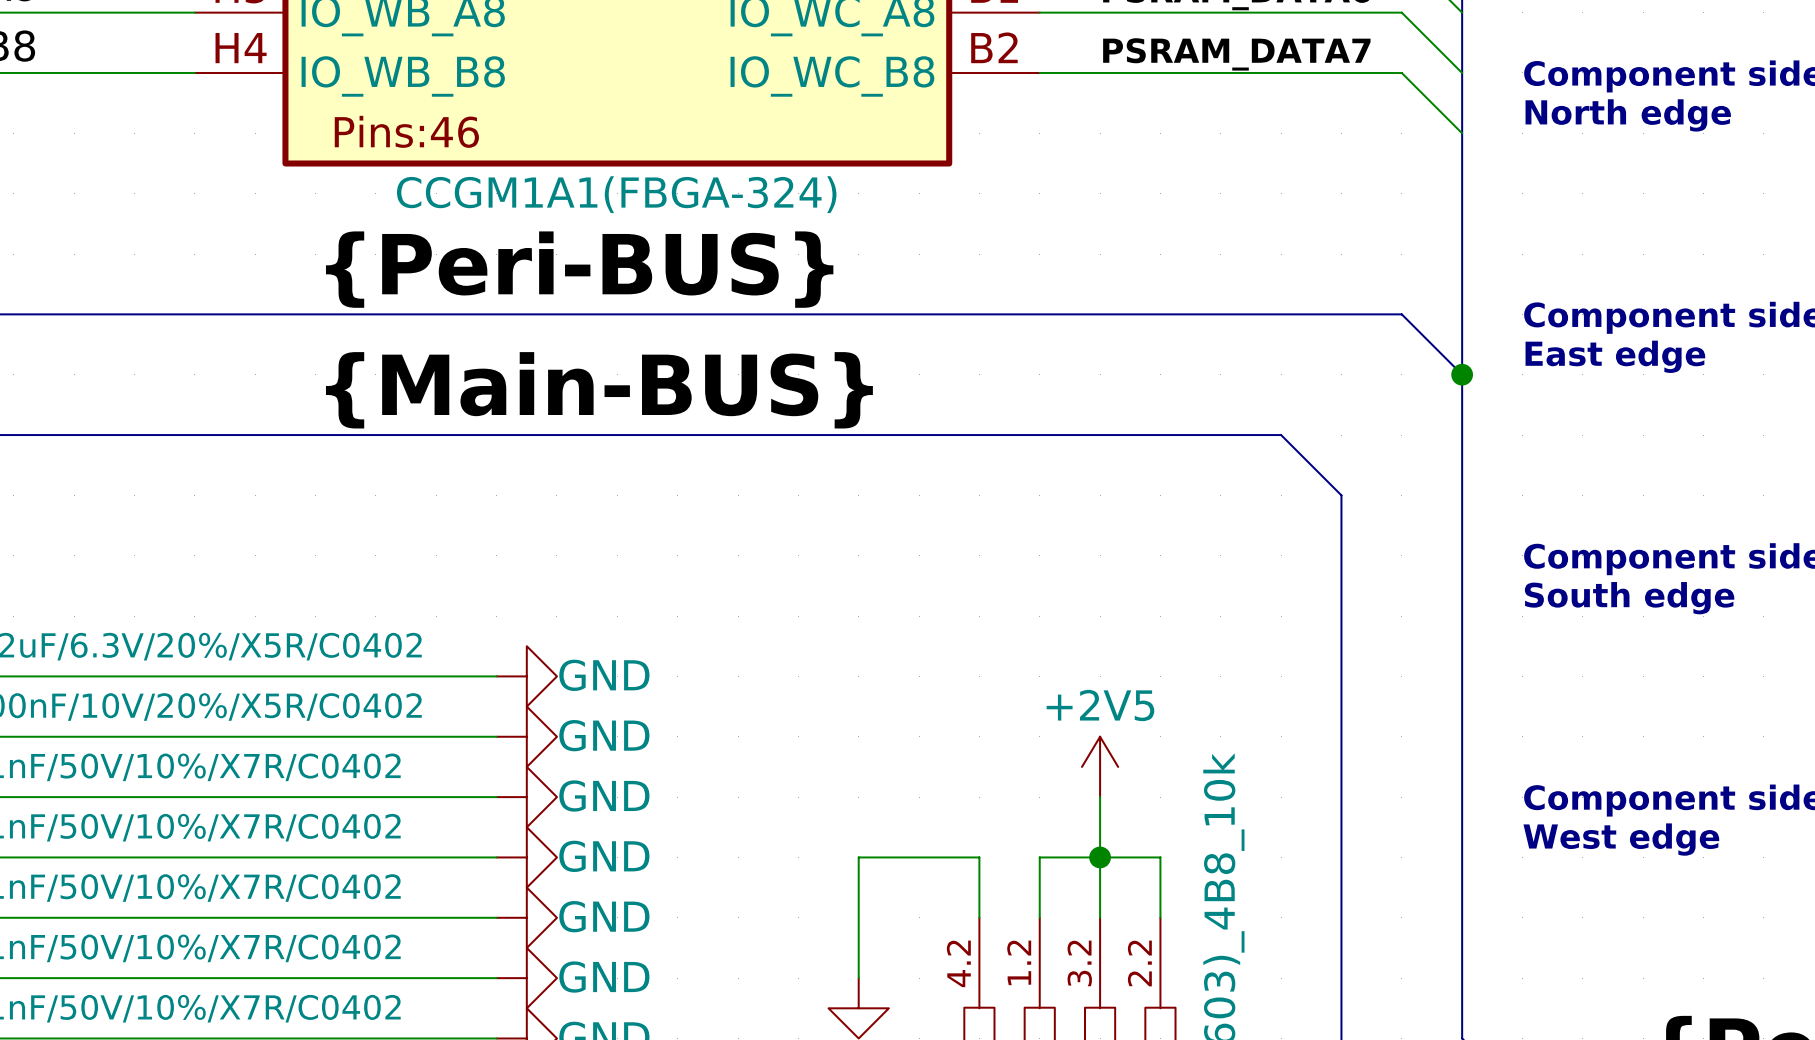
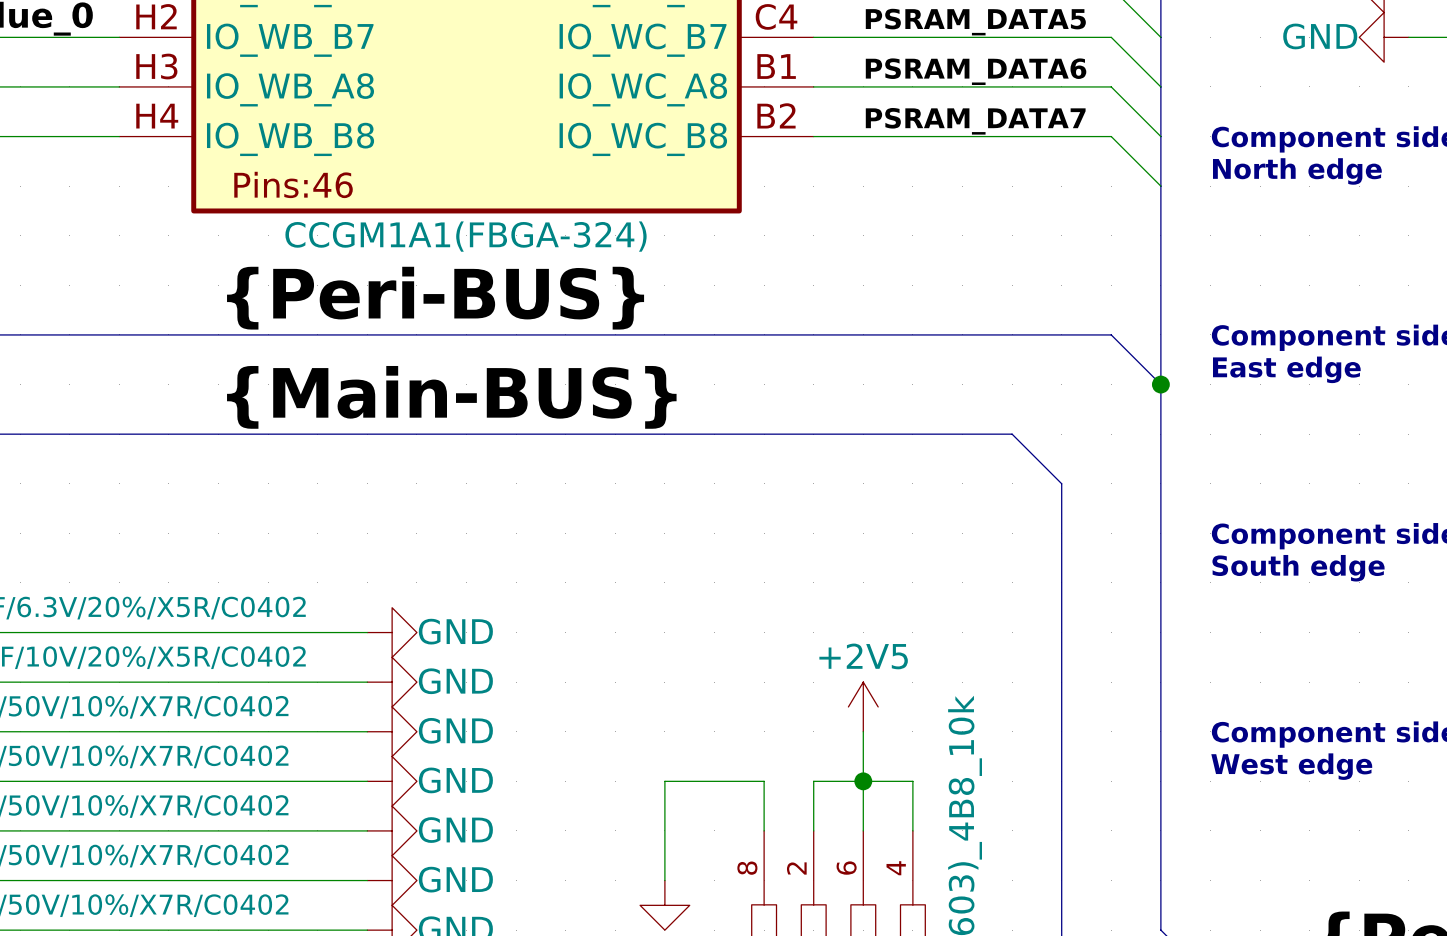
part pin number: 1.2 (1019, 962) -> 2 (796, 868)
part pin number: 4.2 (958, 963) -> 8 (747, 868)
part pin number: 3.2 (1079, 963) -> 6 (846, 868)
part pin number: 2.2 (1139, 963) -> 4 (896, 868)

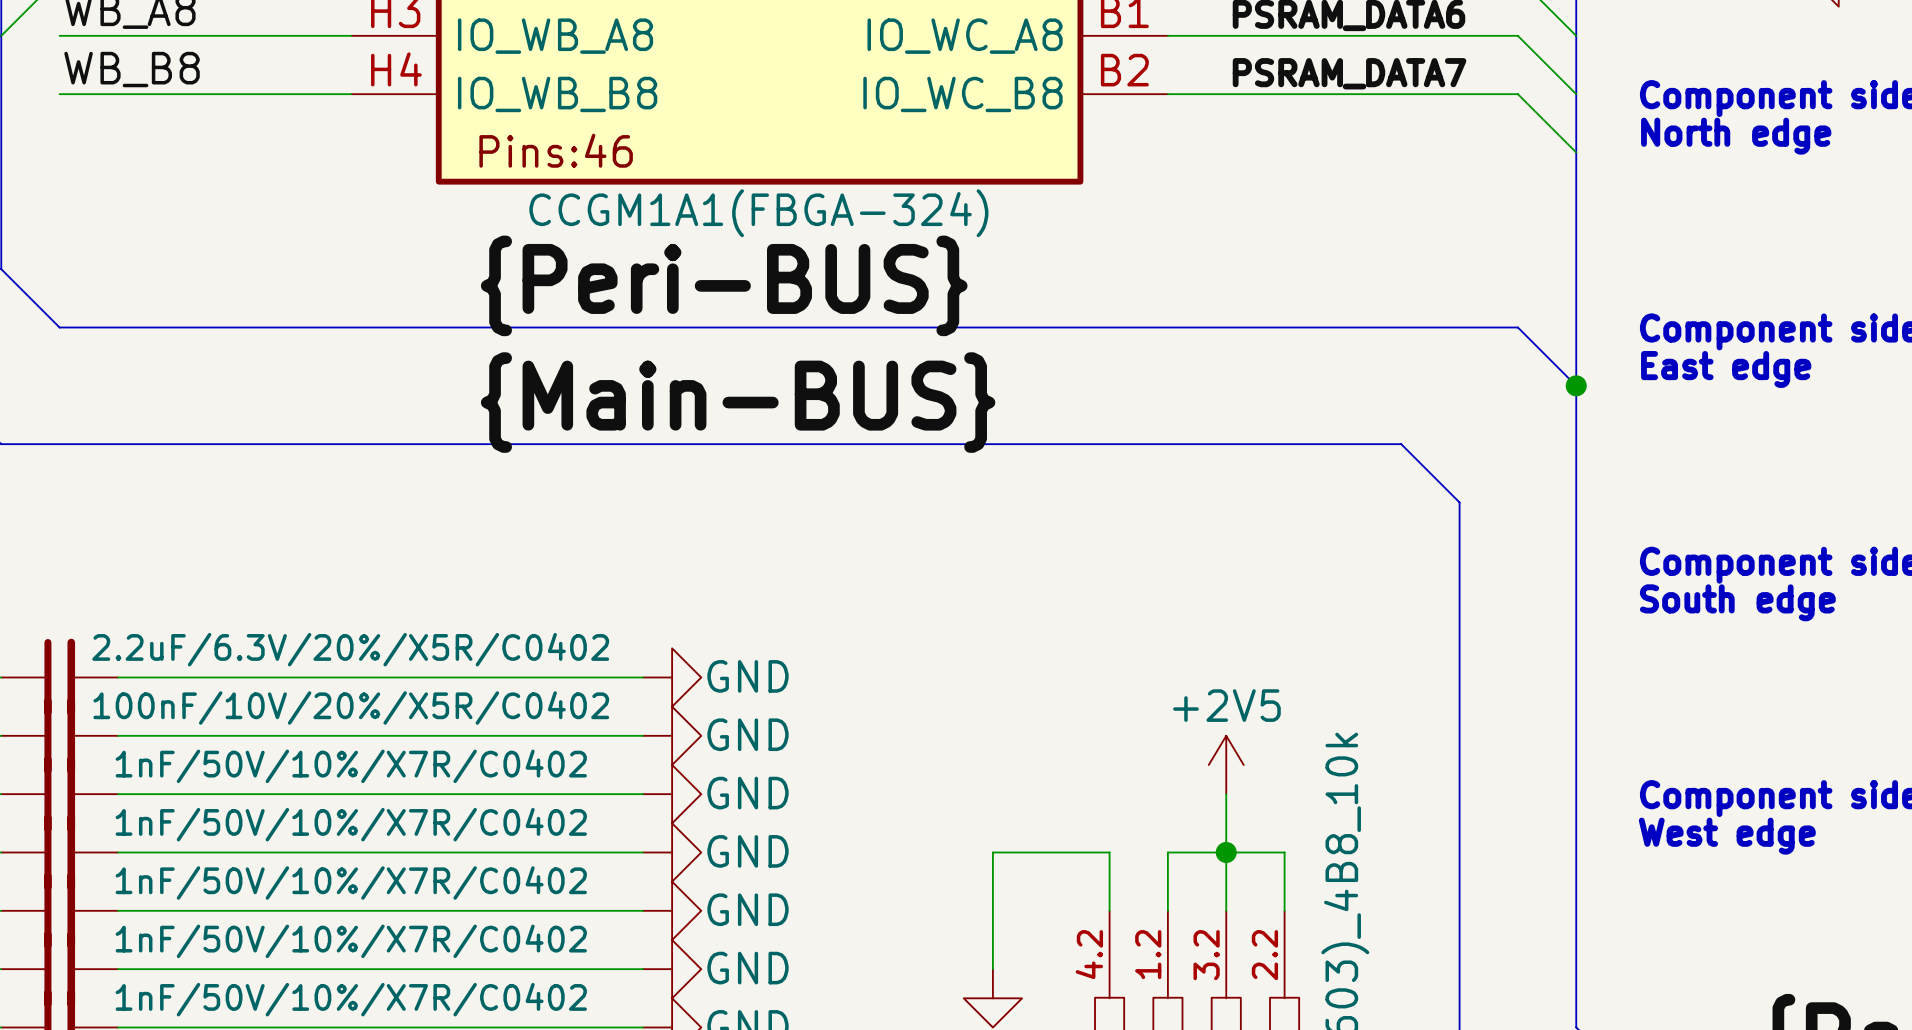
part pin number: 8 (747, 868) -> 4.2 (1089, 954)
part pin number: 2 (796, 868) -> 1.2 (1148, 954)
part pin number: 6 (846, 868) -> 3.2 (1206, 955)
part pin number: 4 (896, 868) -> 2.2 (1264, 955)

